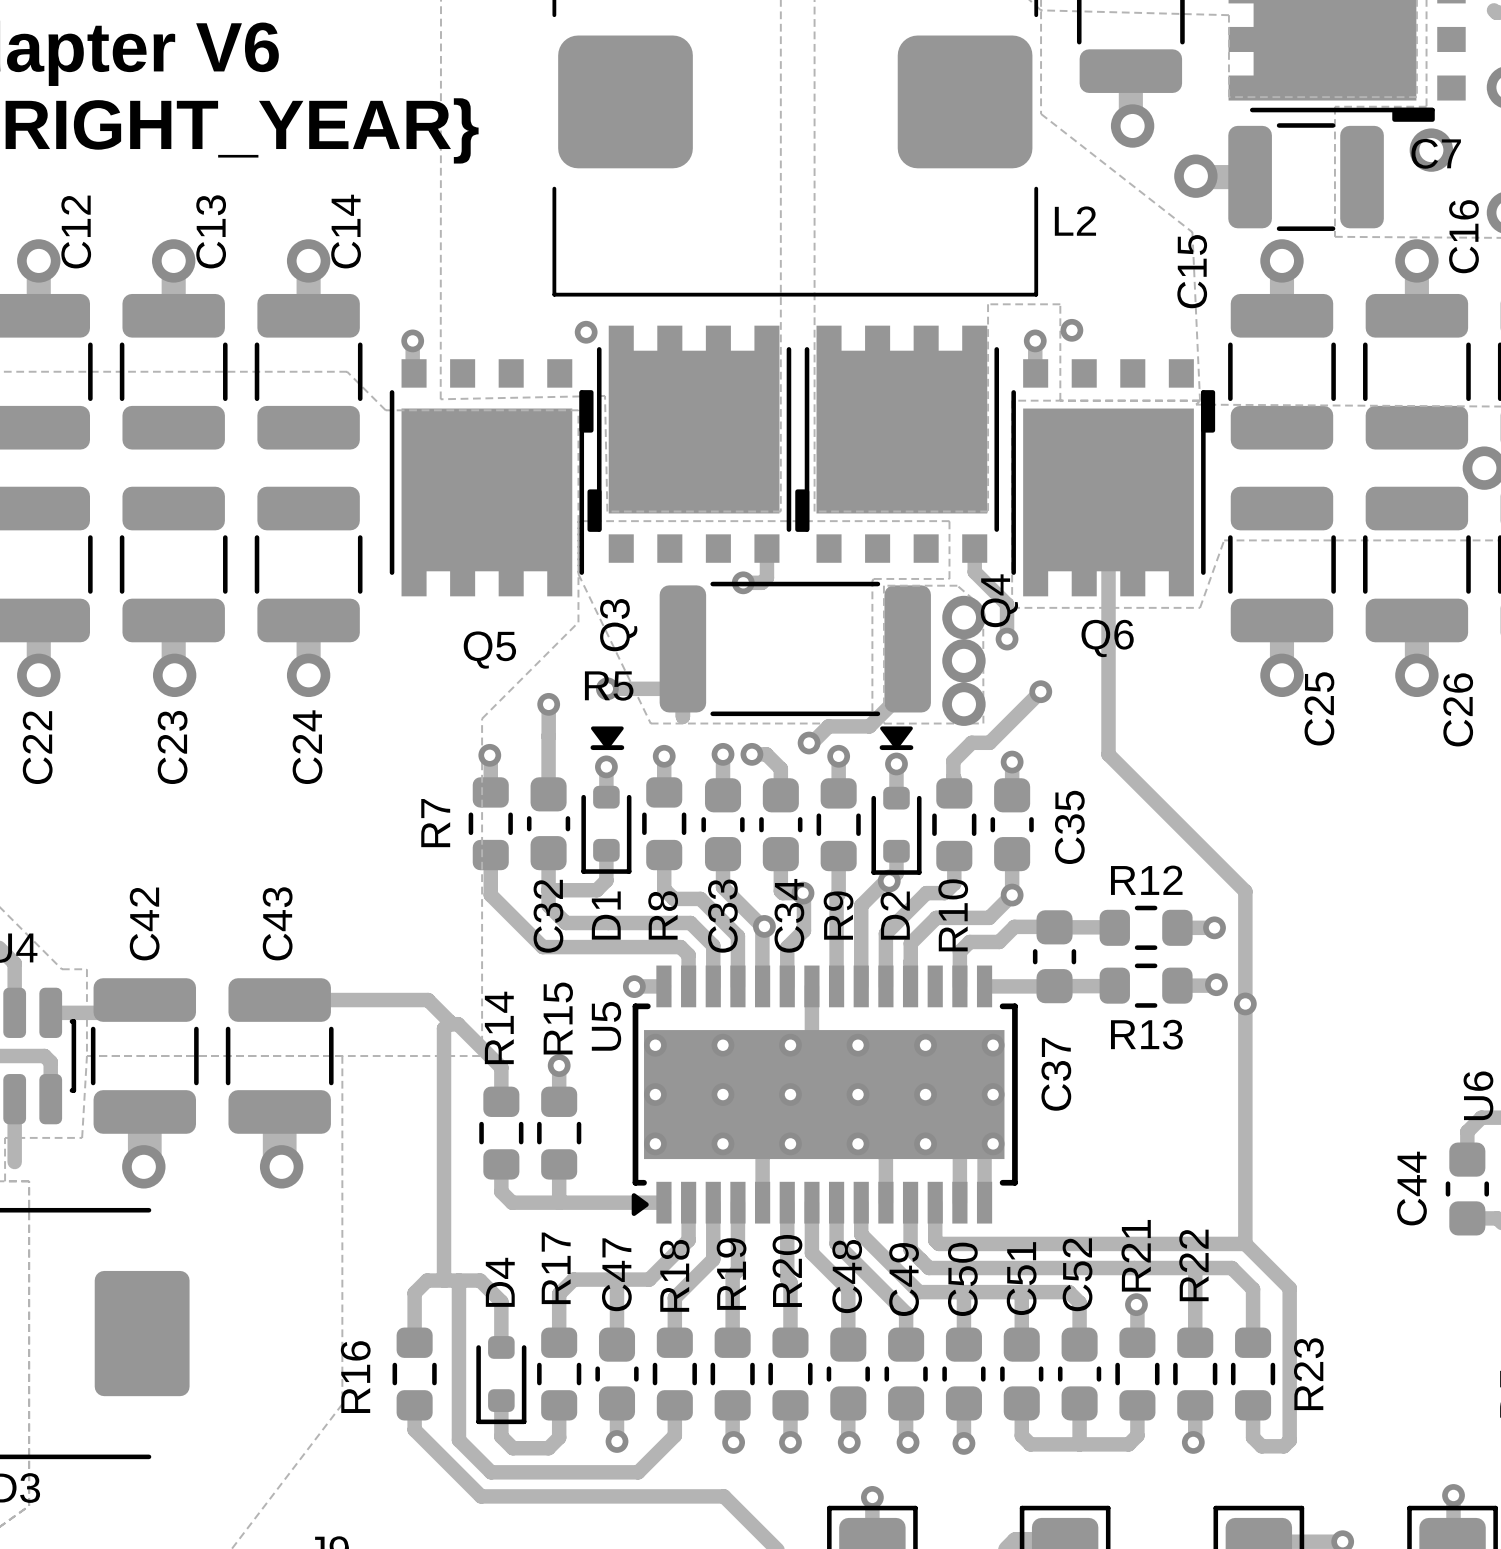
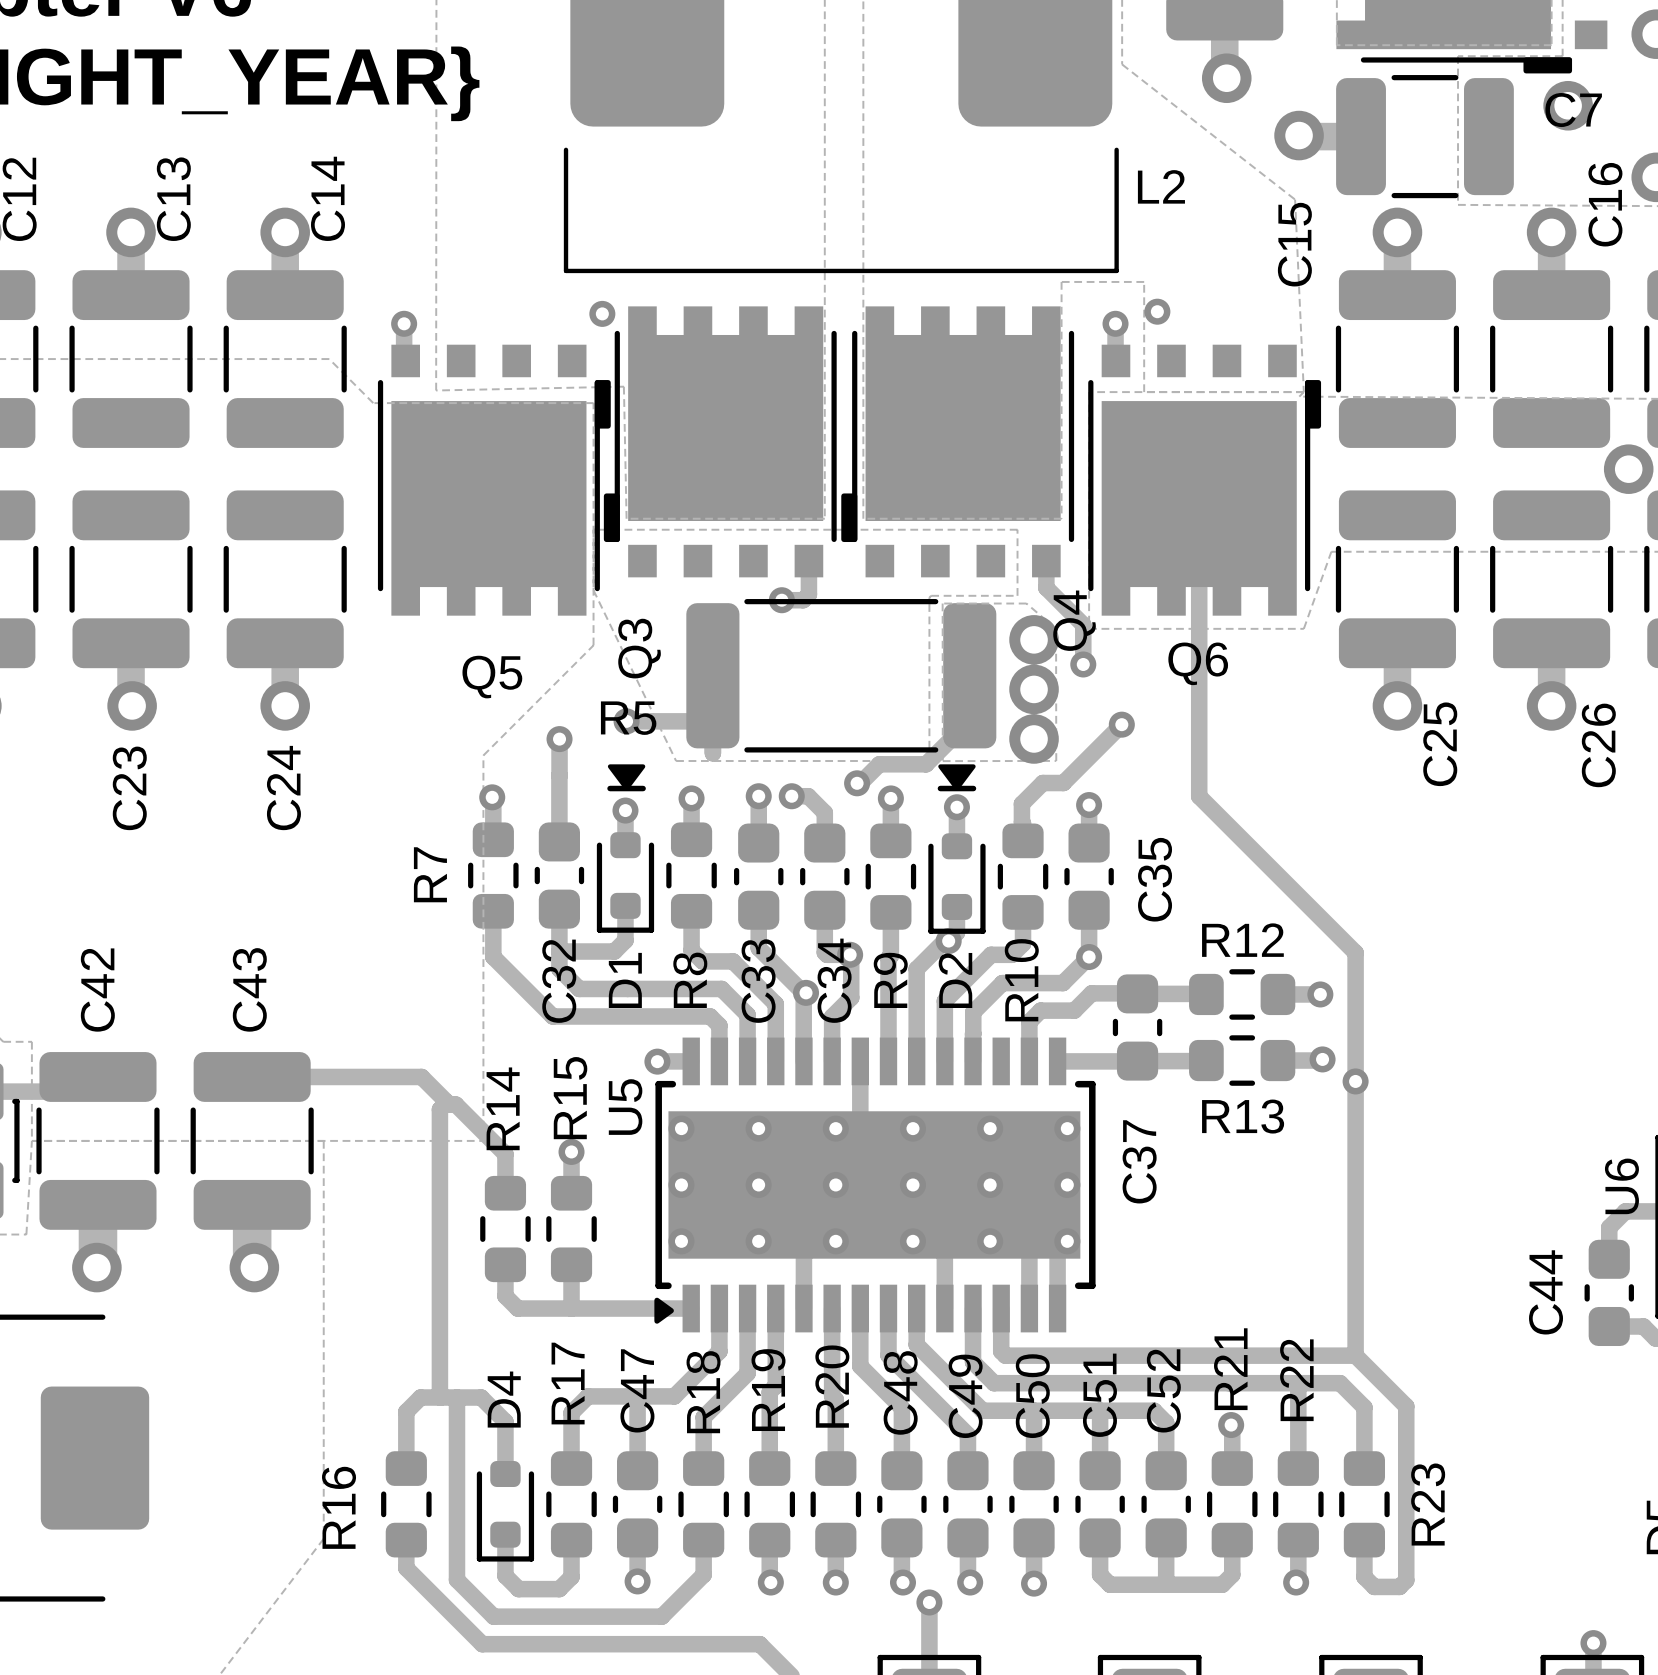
track: none -> (929, 1602) (929, 1645)
via position: (872, 1497) -> (929, 1602)

